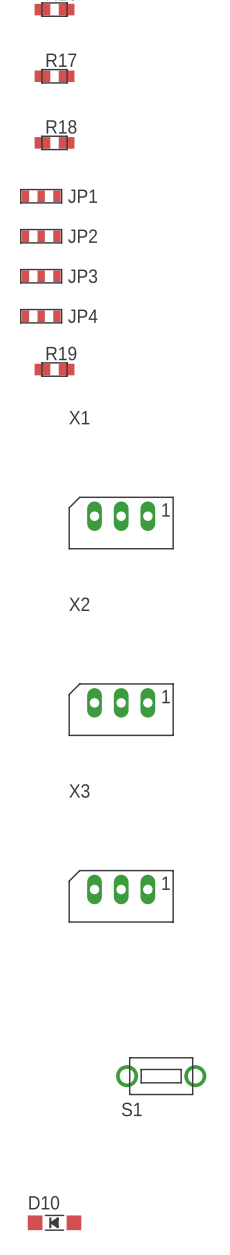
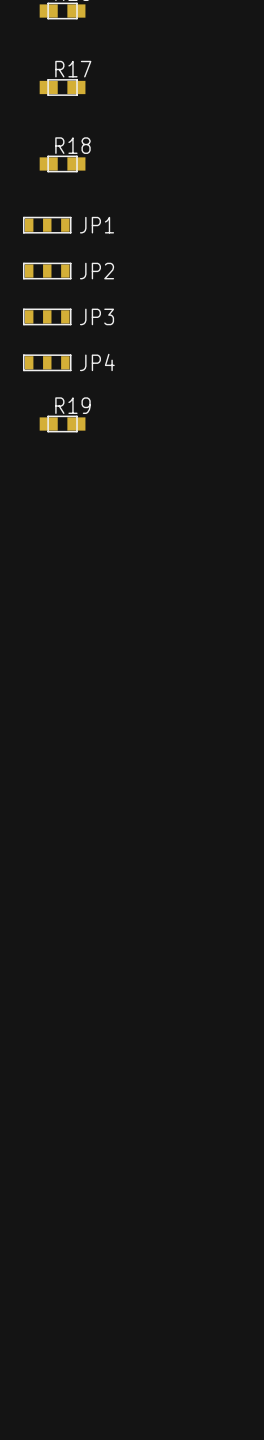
X1: (121, 523) -> none
X2: (121, 709) -> none
X3: (121, 896) -> none
S1: (161, 1076) -> none
D10: (54, 1222) -> none

